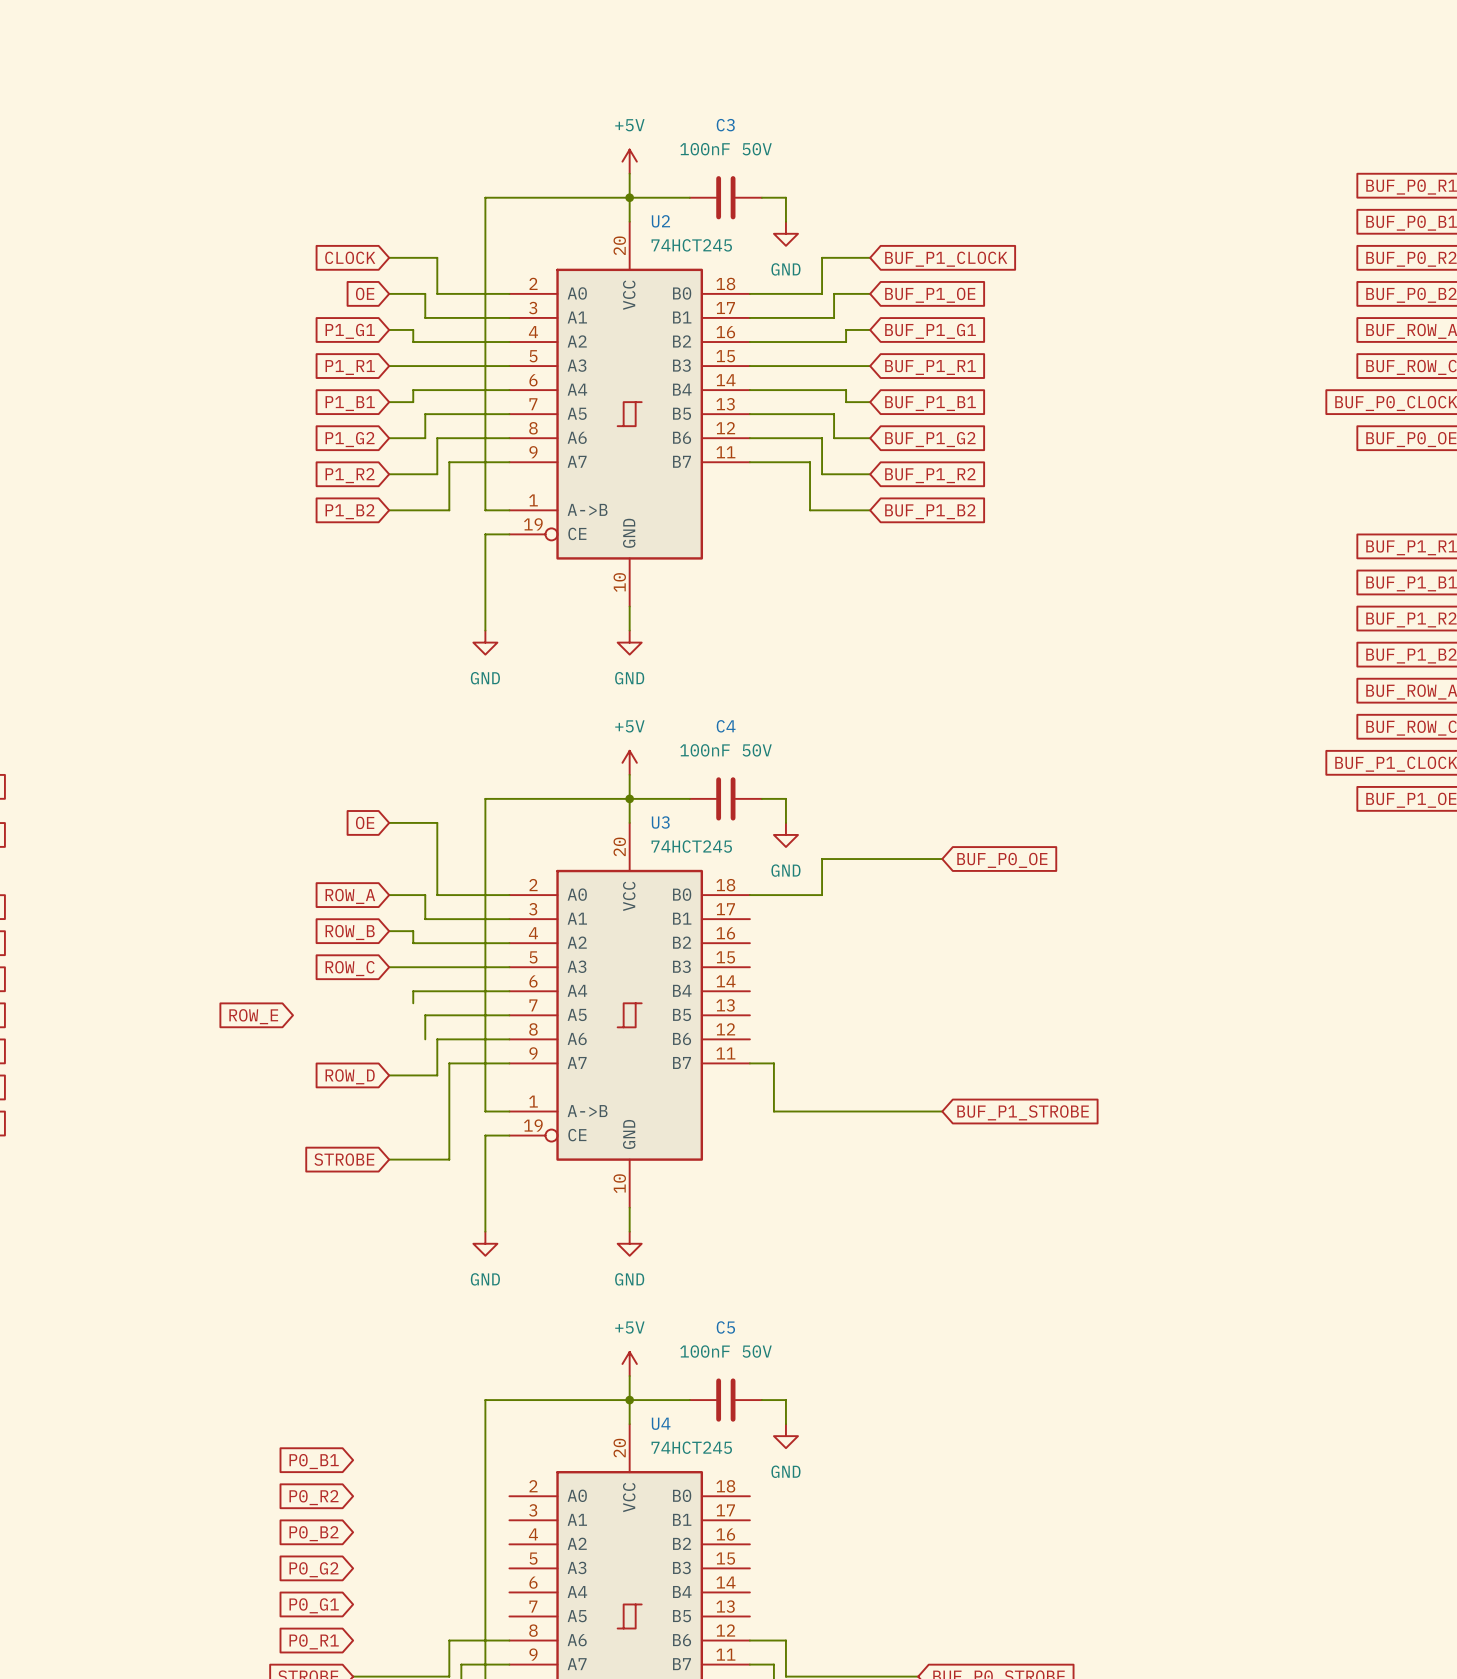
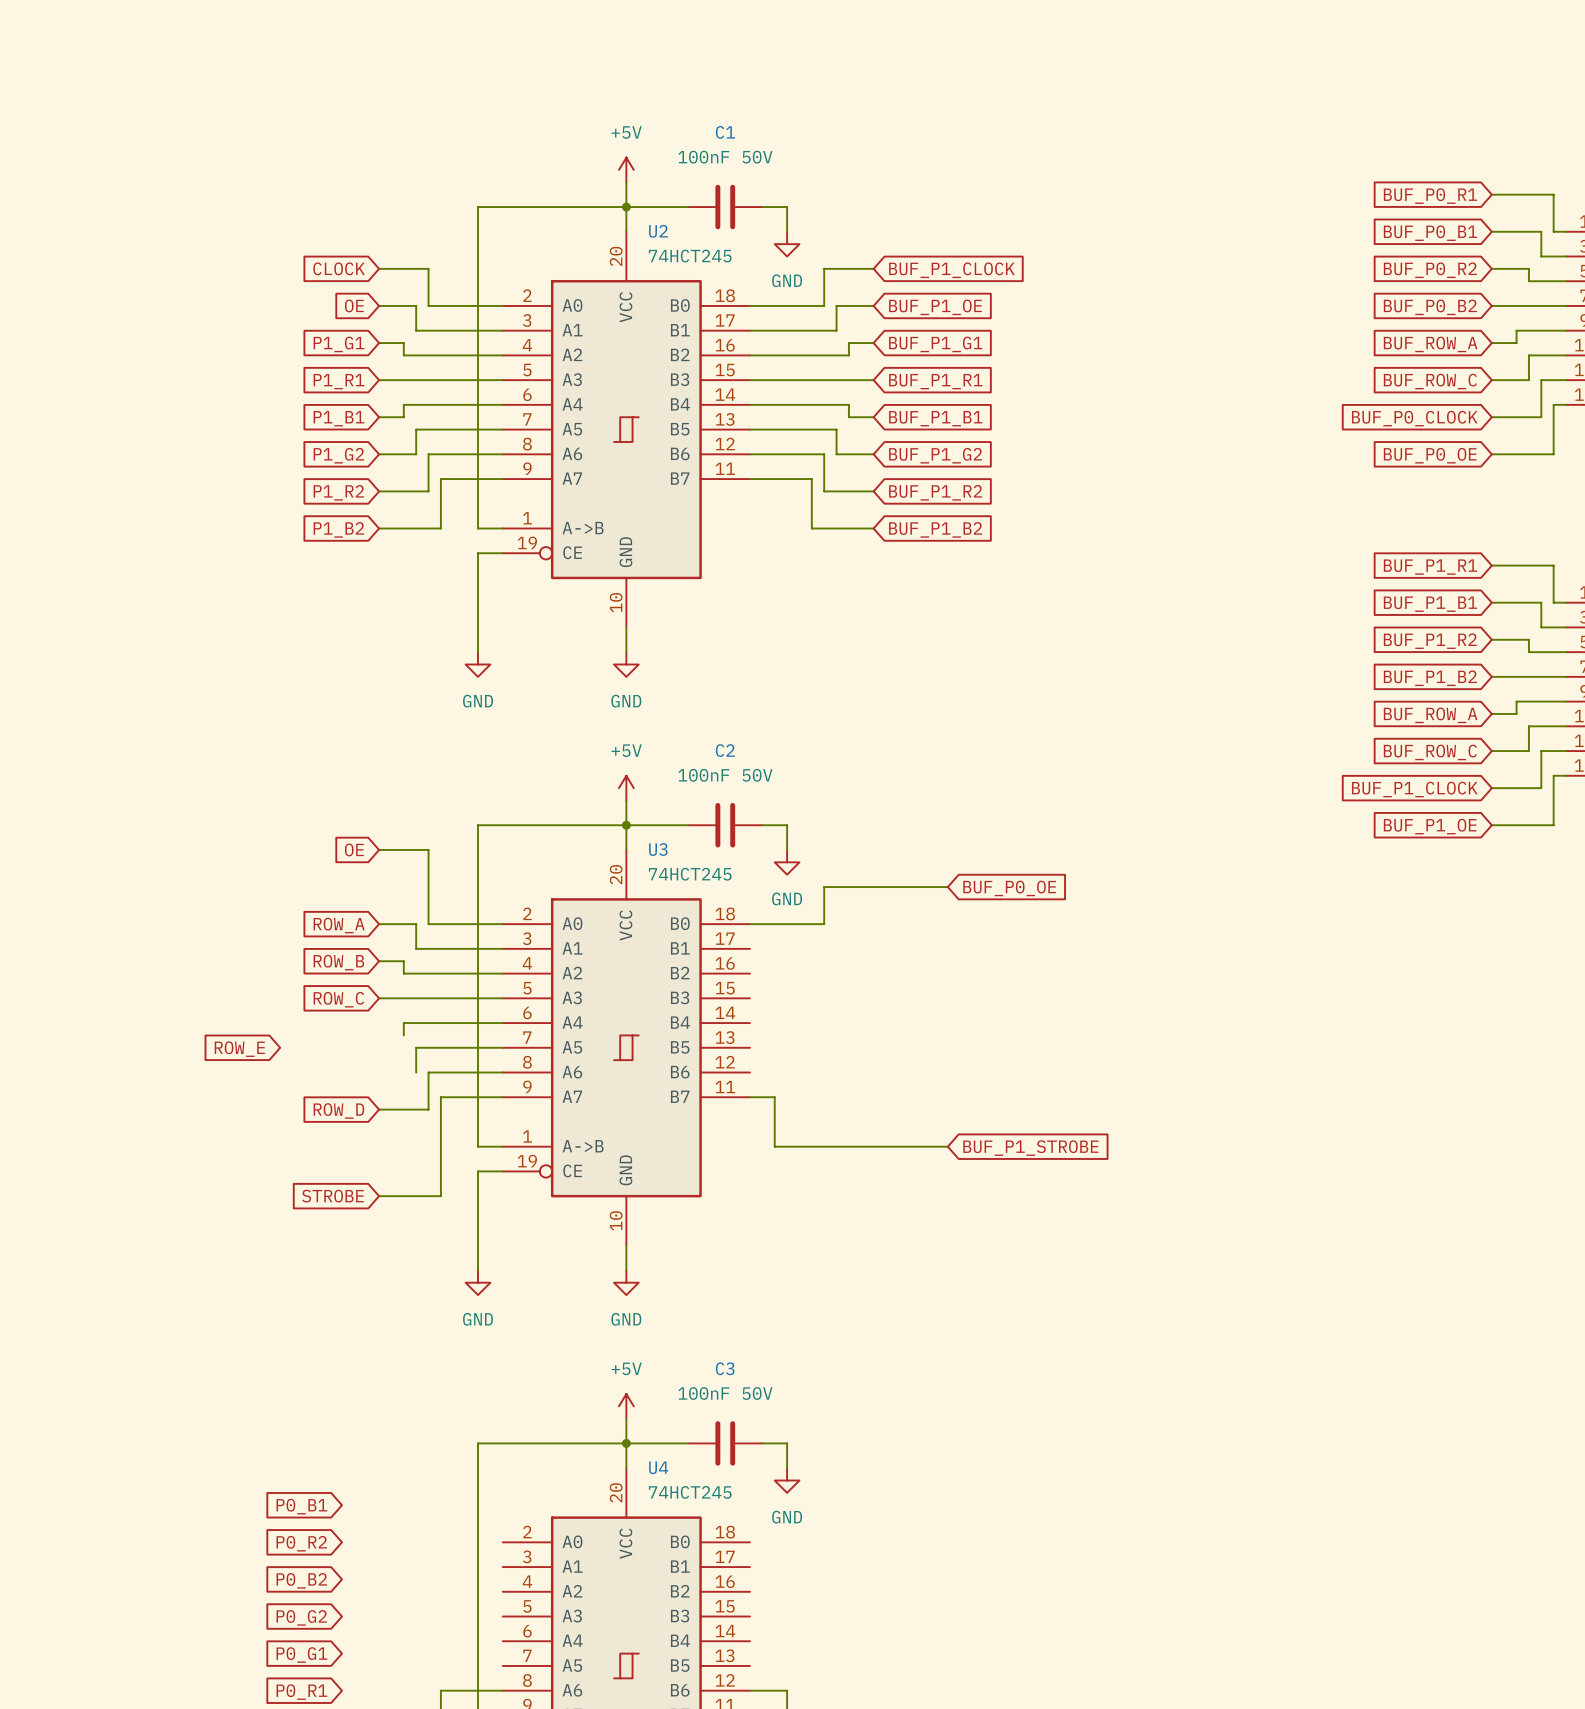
C3 name: C3 (725, 125) -> C1 (725, 132)
C4 name: C4 (726, 726) -> C2 (725, 750)
C5 name: C5 (725, 1327) -> C3 (725, 1368)

